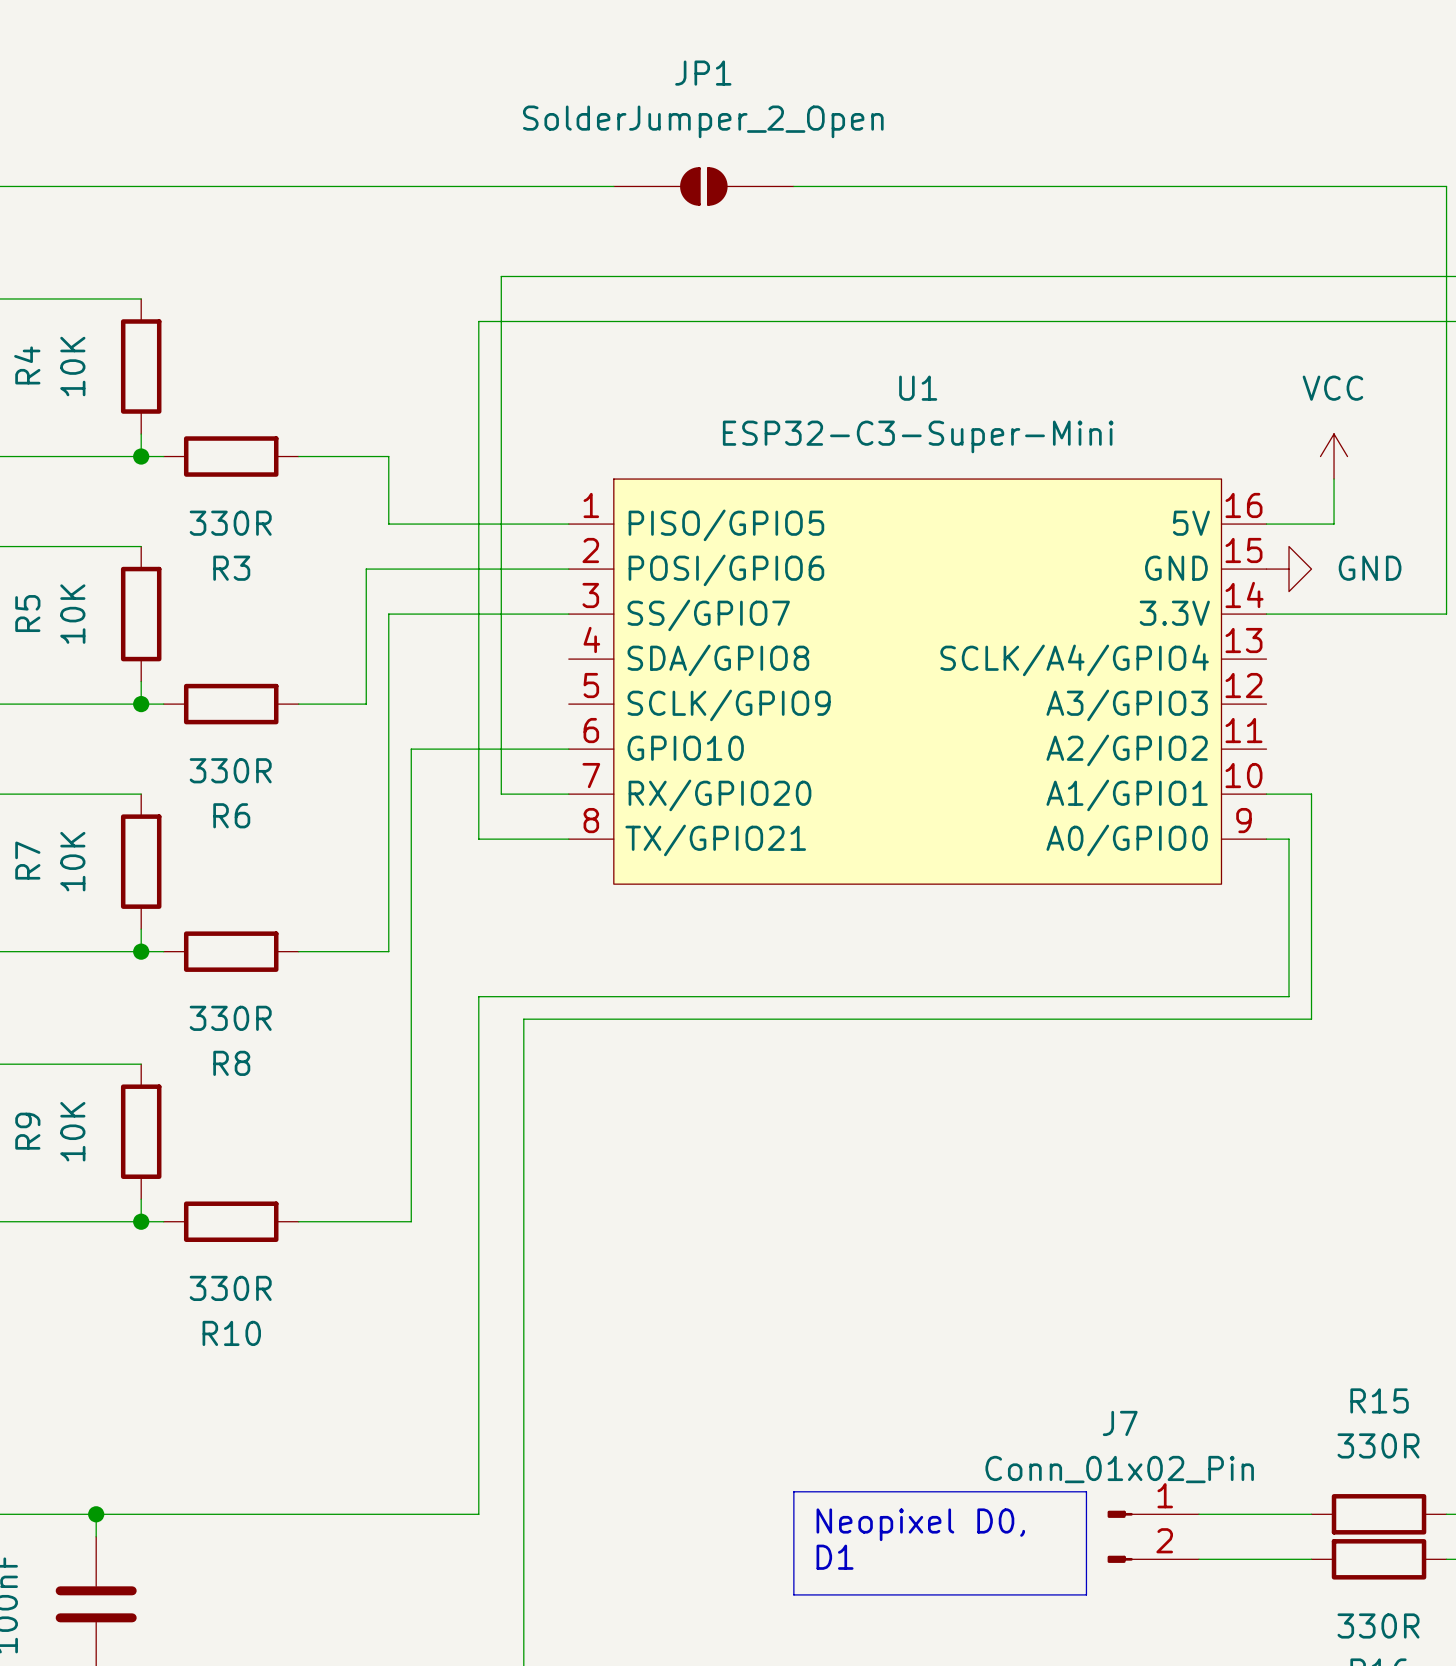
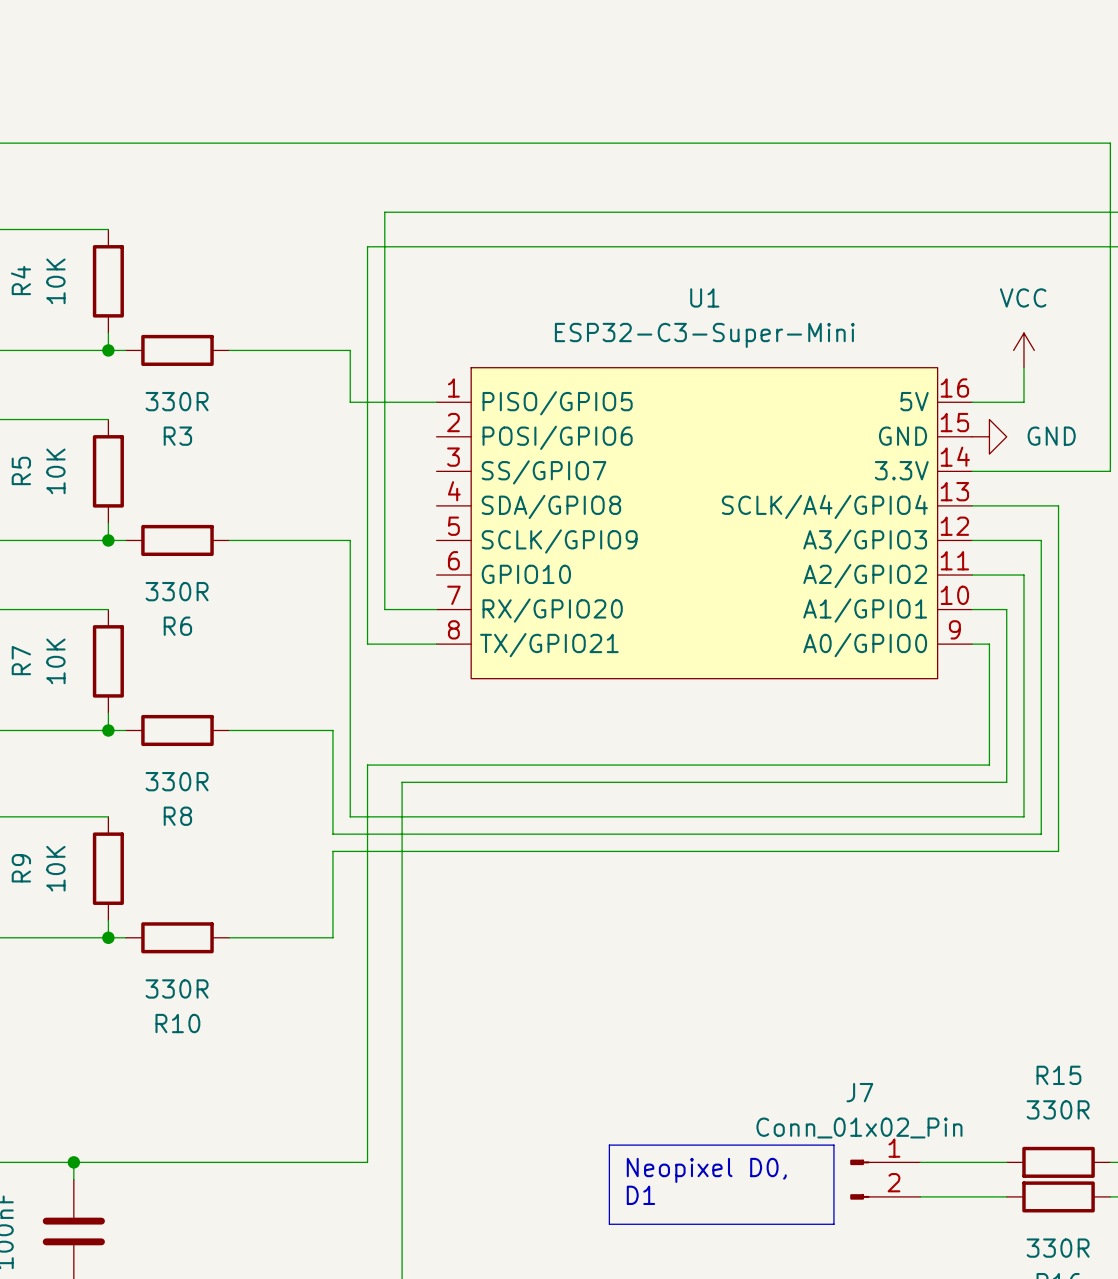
JP1: SolderJumper_2_Open (703, 186) -> none
wire: (388, 456) (388, 524) (456, 524) -> (298, 350) (350, 350) (350, 402)
wire: (568, 569) (366, 569) (366, 704) -> (972, 575) (1023, 575) (1023, 816) (350, 816) (350, 540) (281, 540)
wire: (568, 614) (388, 614) (388, 951) -> (972, 540) (1041, 540) (1041, 834) (332, 834) (332, 730) (298, 730)
wire: (568, 749) (411, 749) (411, 1221) -> (972, 505) (1058, 505) (1058, 851) (332, 851) (332, 937) (315, 937)

